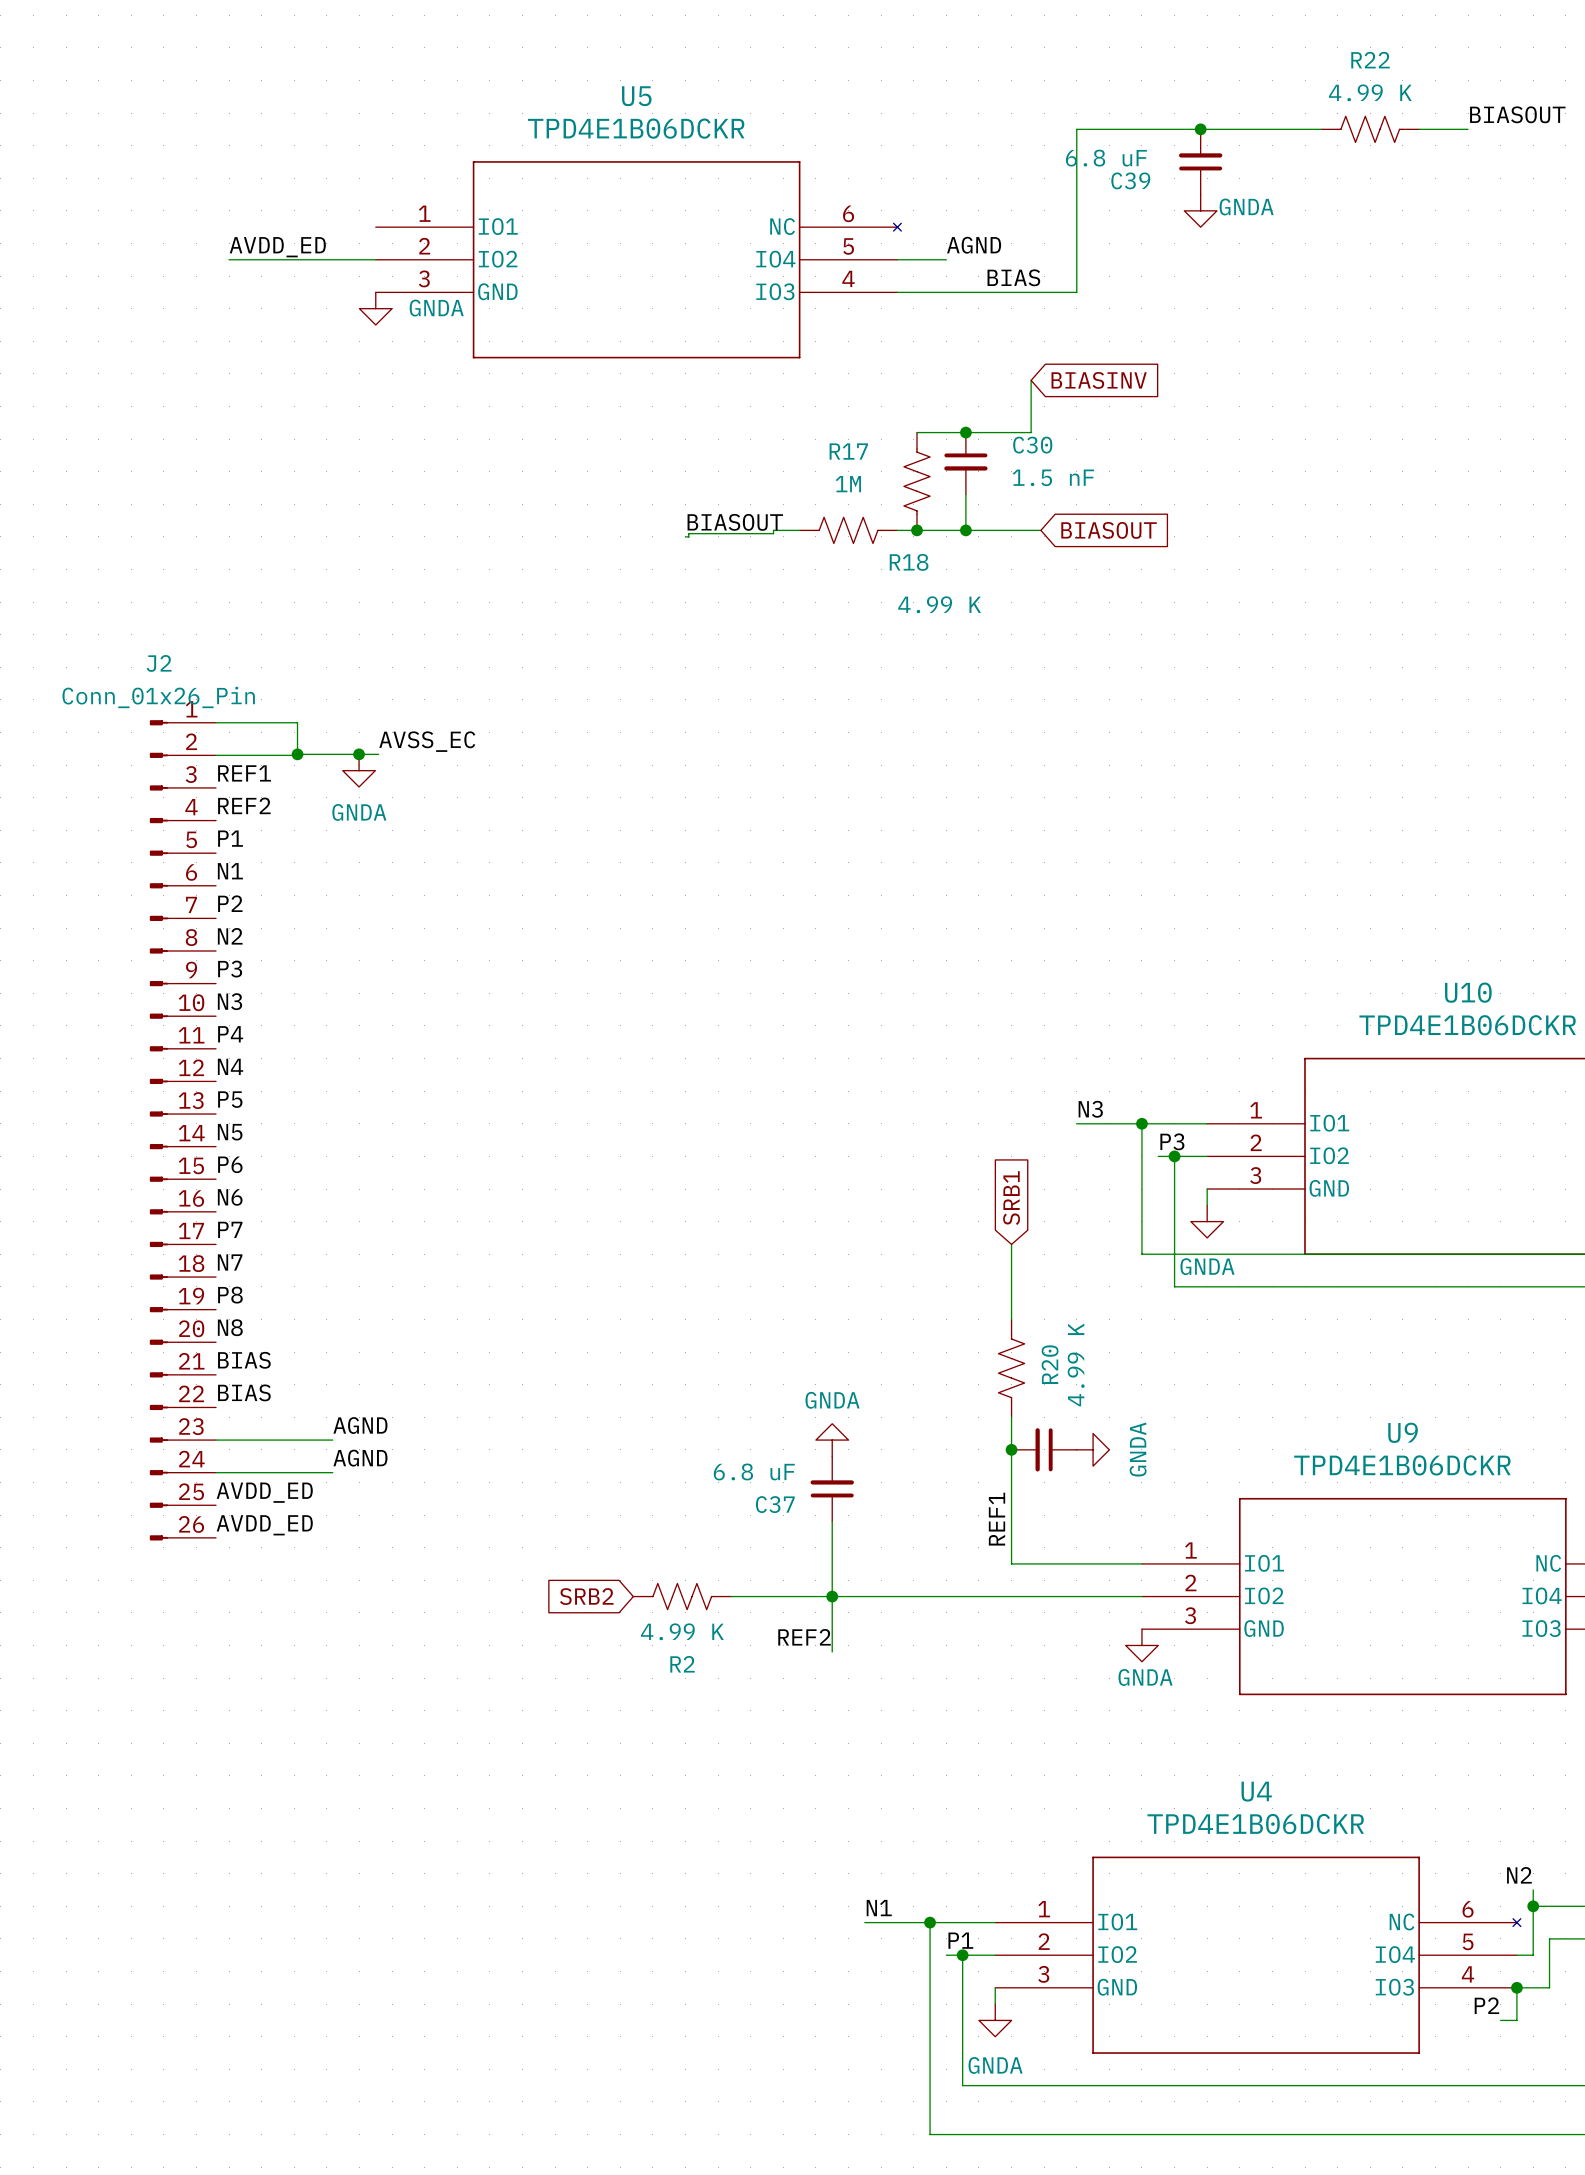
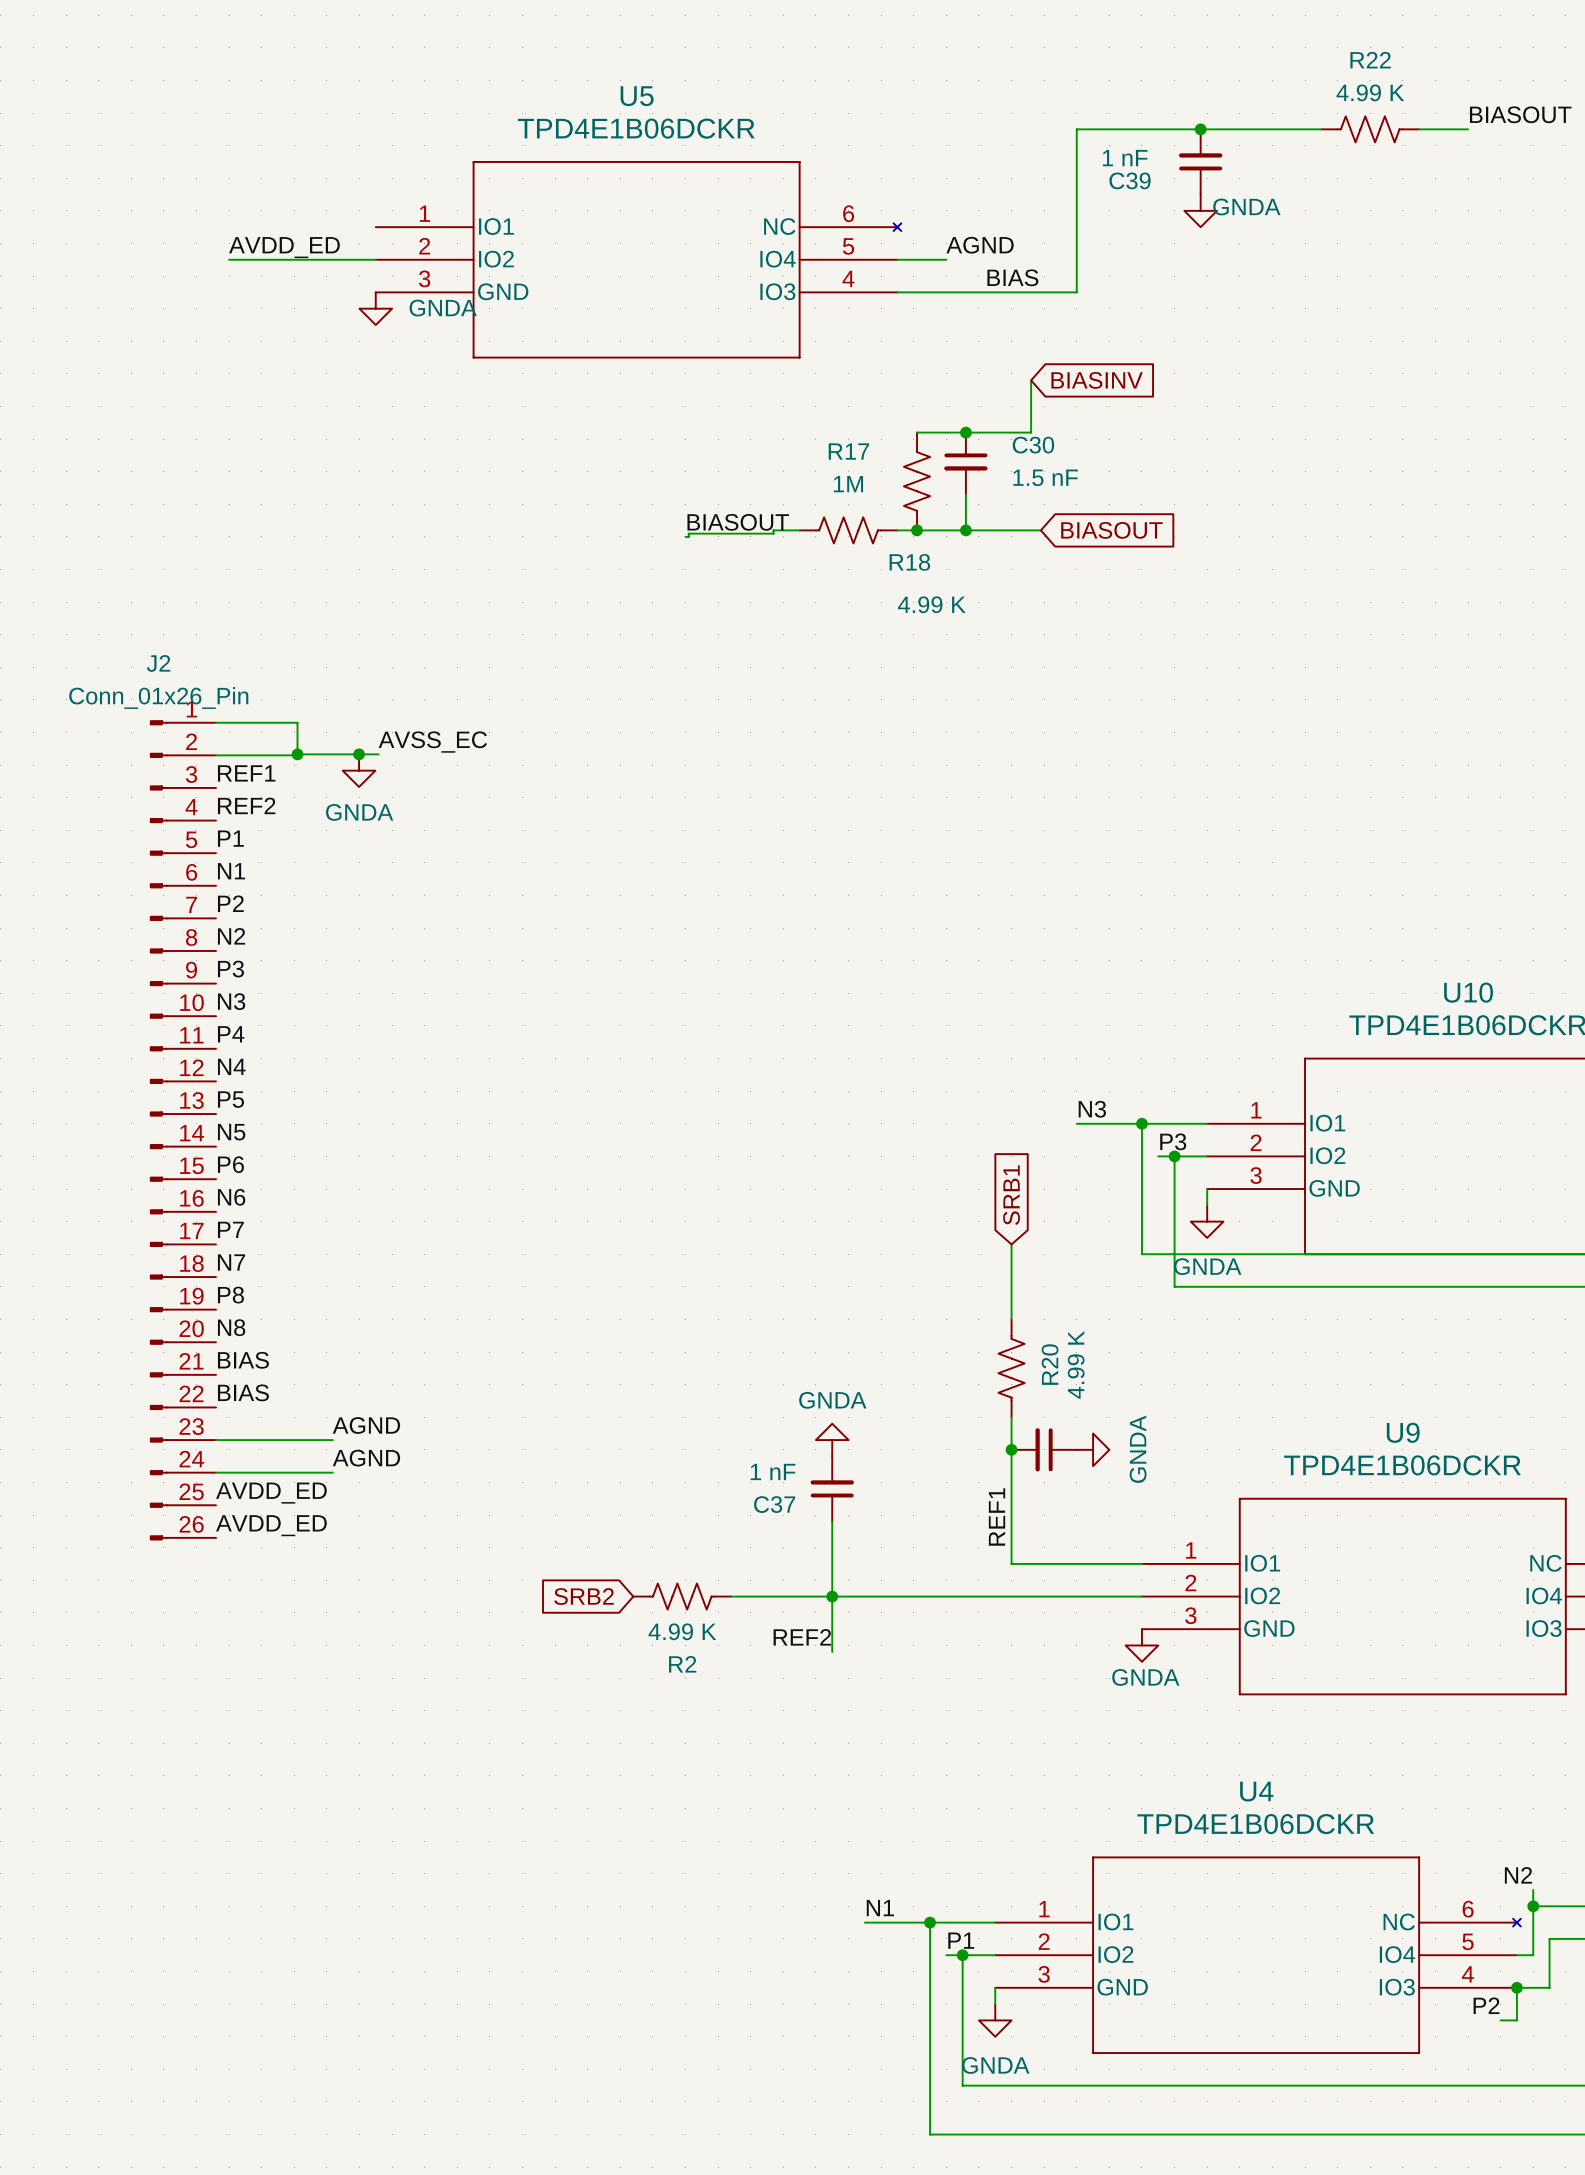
C39 value: 6.8 uF (1106, 158) -> 1 nF (1125, 158)
C37 value: 6.8 uF (754, 1471) -> 1 nF (773, 1471)

